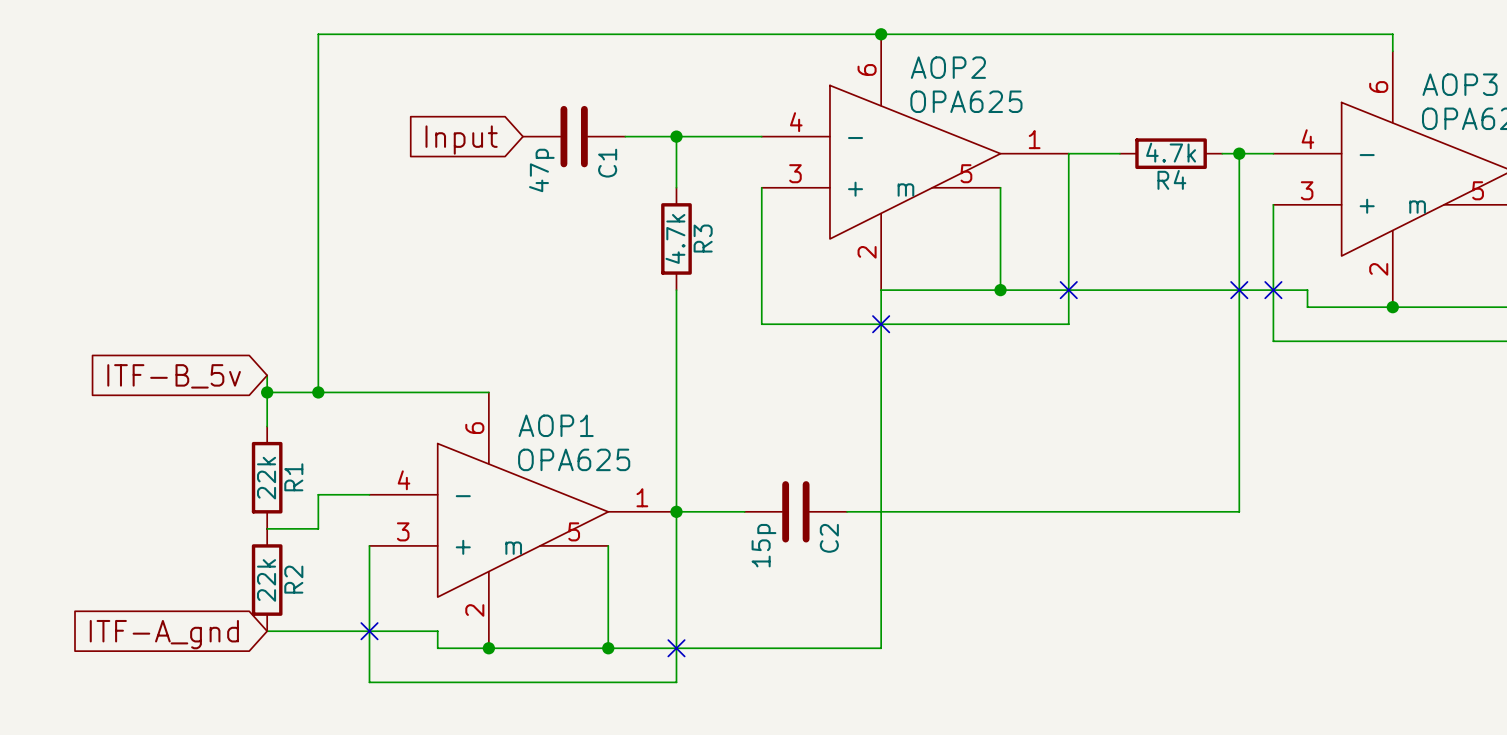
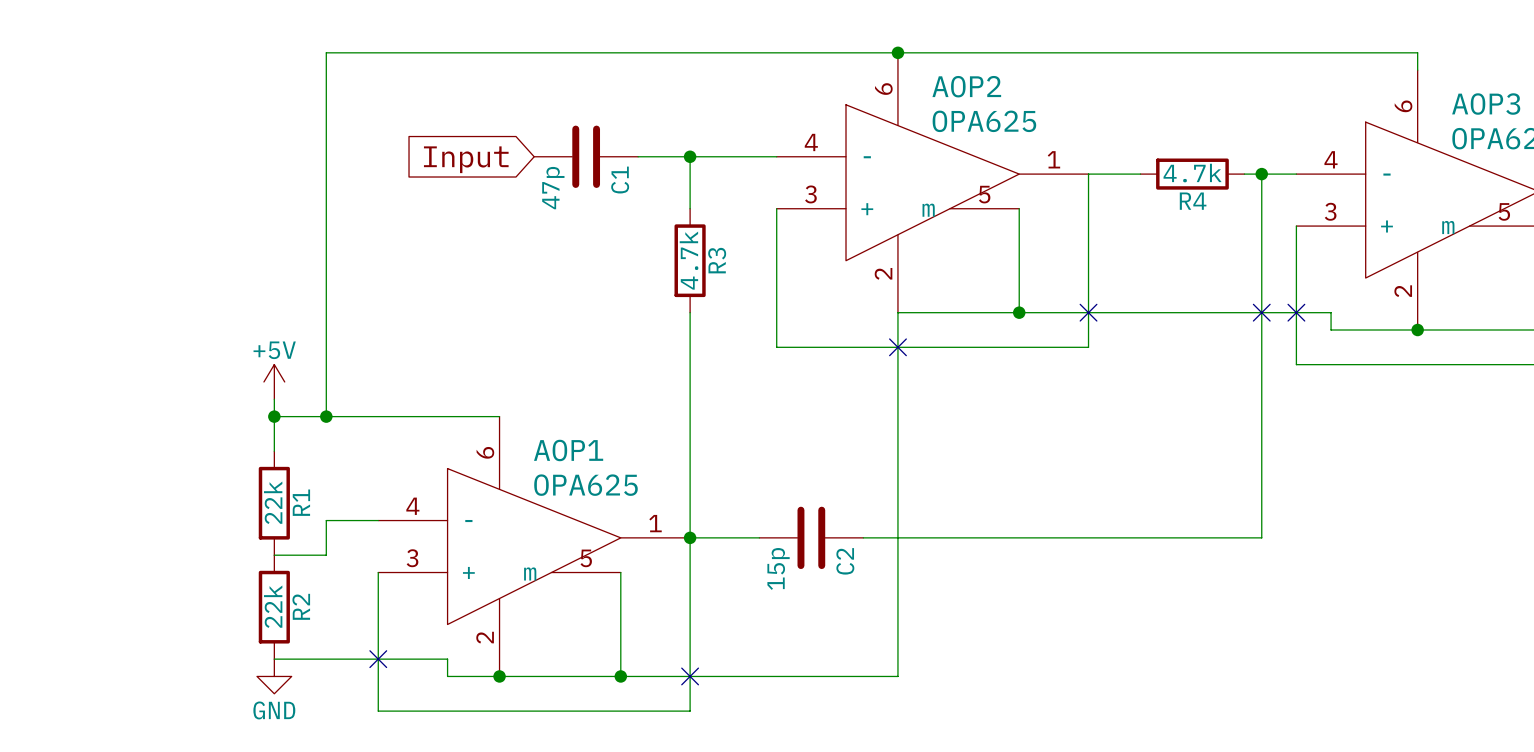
power symbol: none -> +5V (274, 381)
global label: ITF-B_5v (174, 376) -> none
global label: ITF-A_gnd (164, 634) -> none
power symbol: none -> GND (274, 676)

